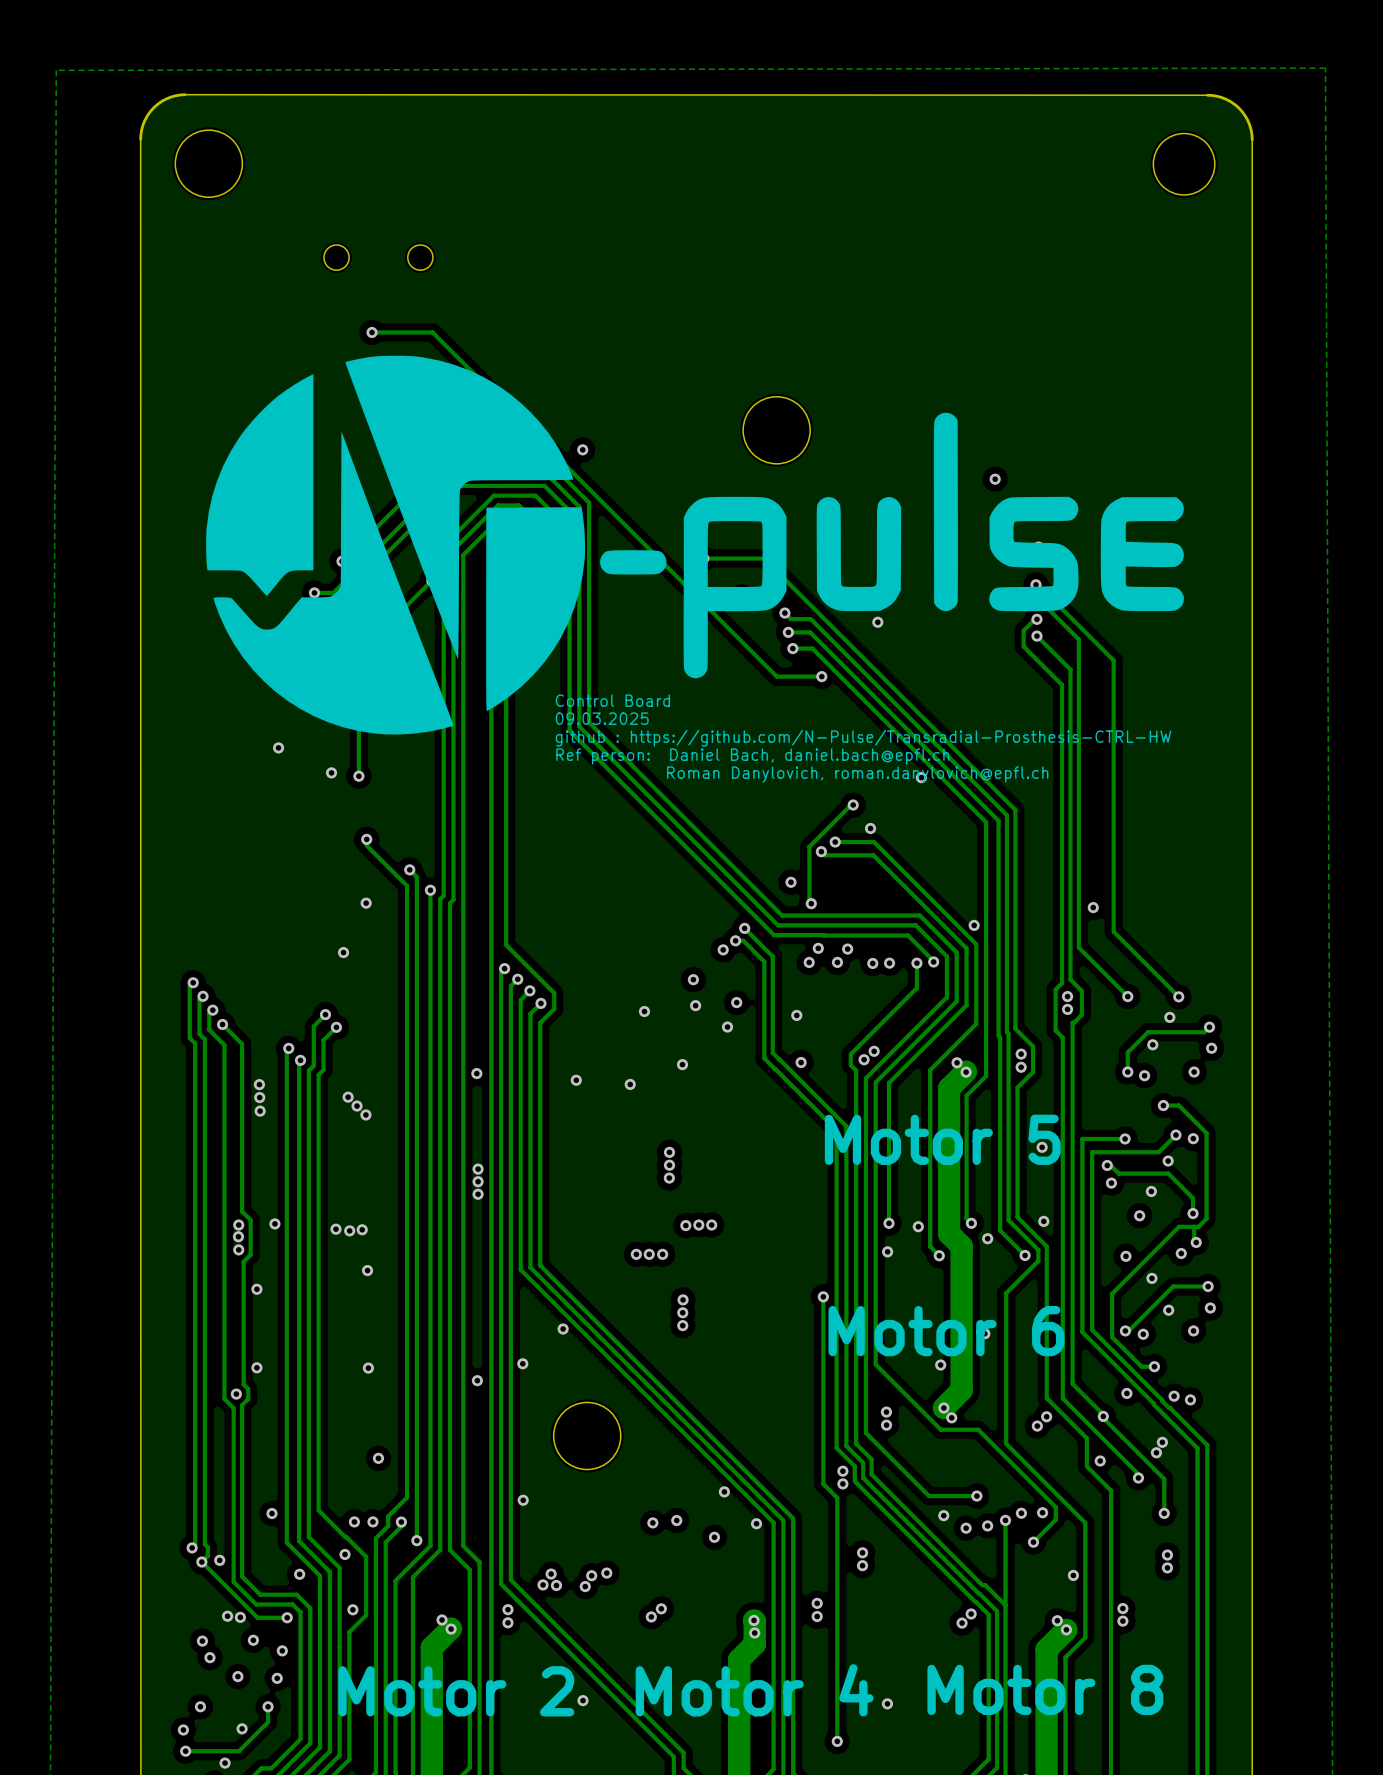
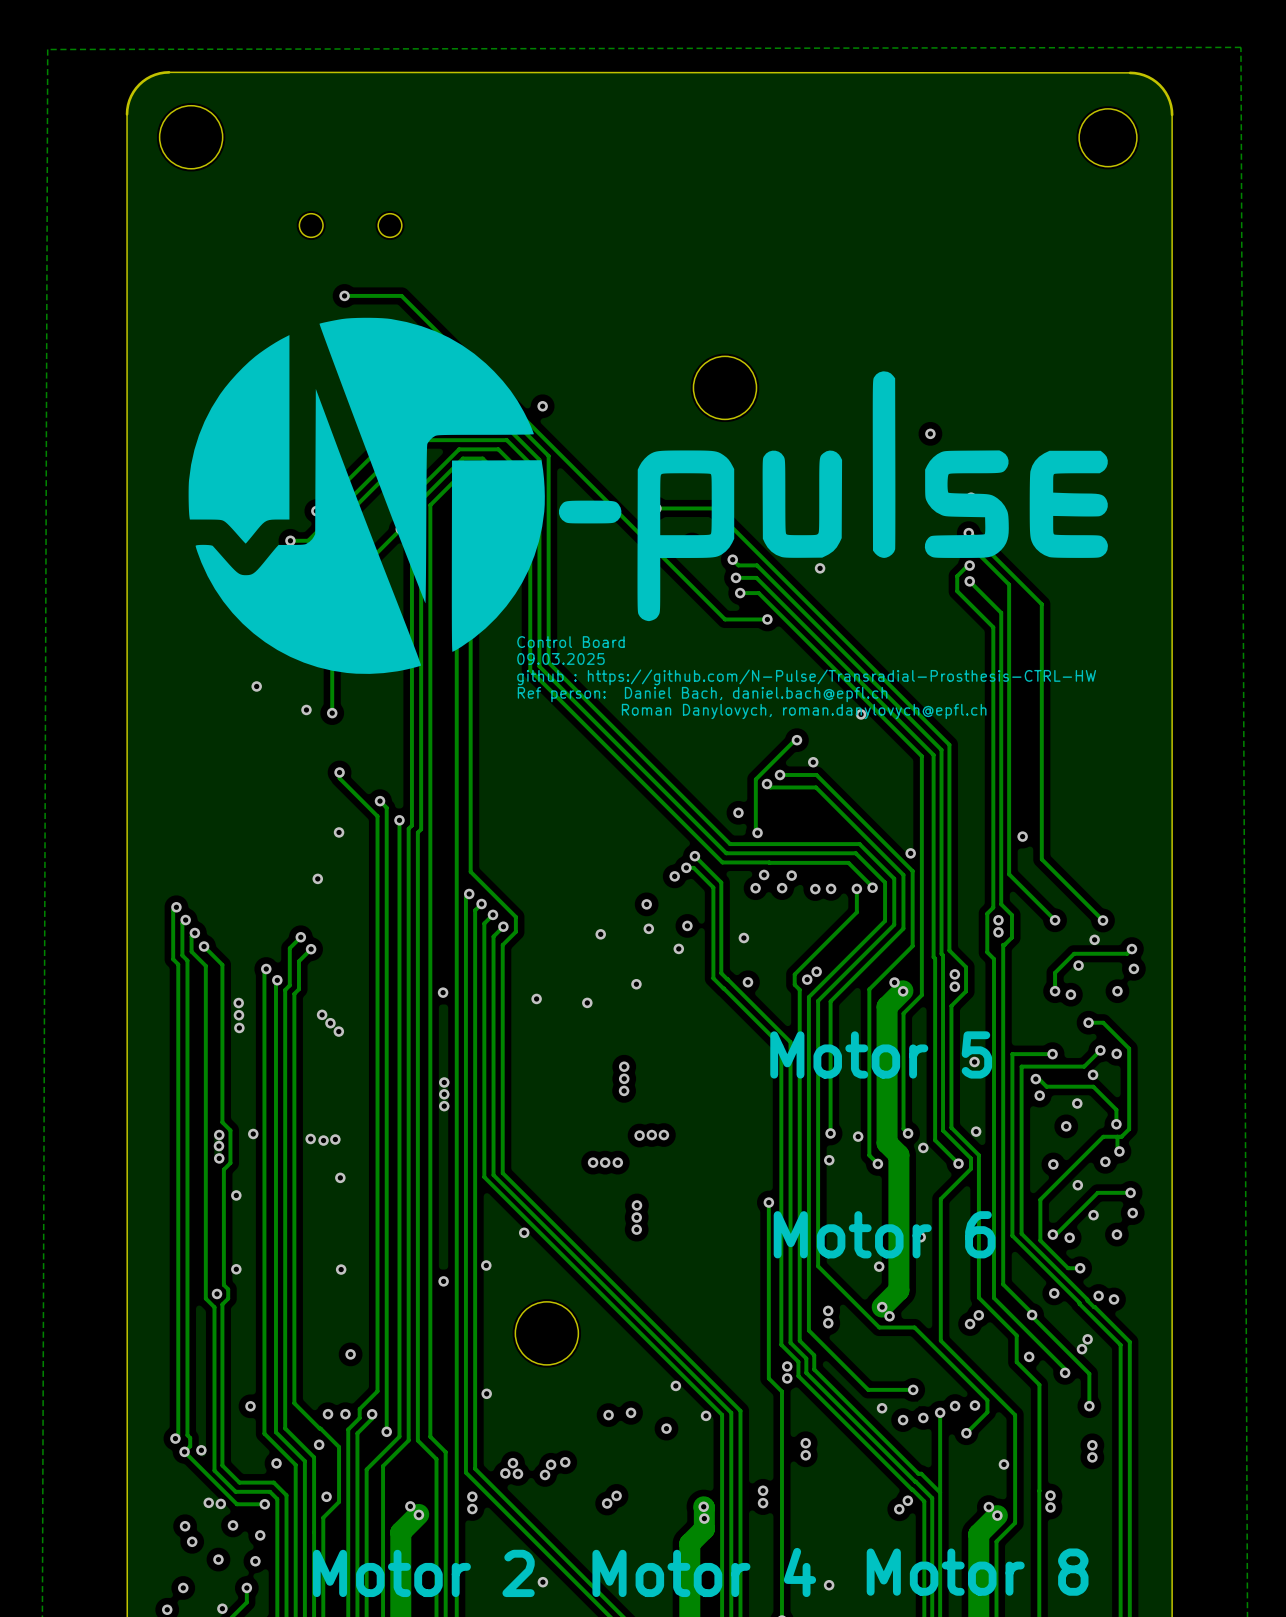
text: Roman Danylovich, roman.danylovich@epfl.ch (857, 774) -> Roman Danylovych, roman.danylovych@epfl.ch (804, 711)

